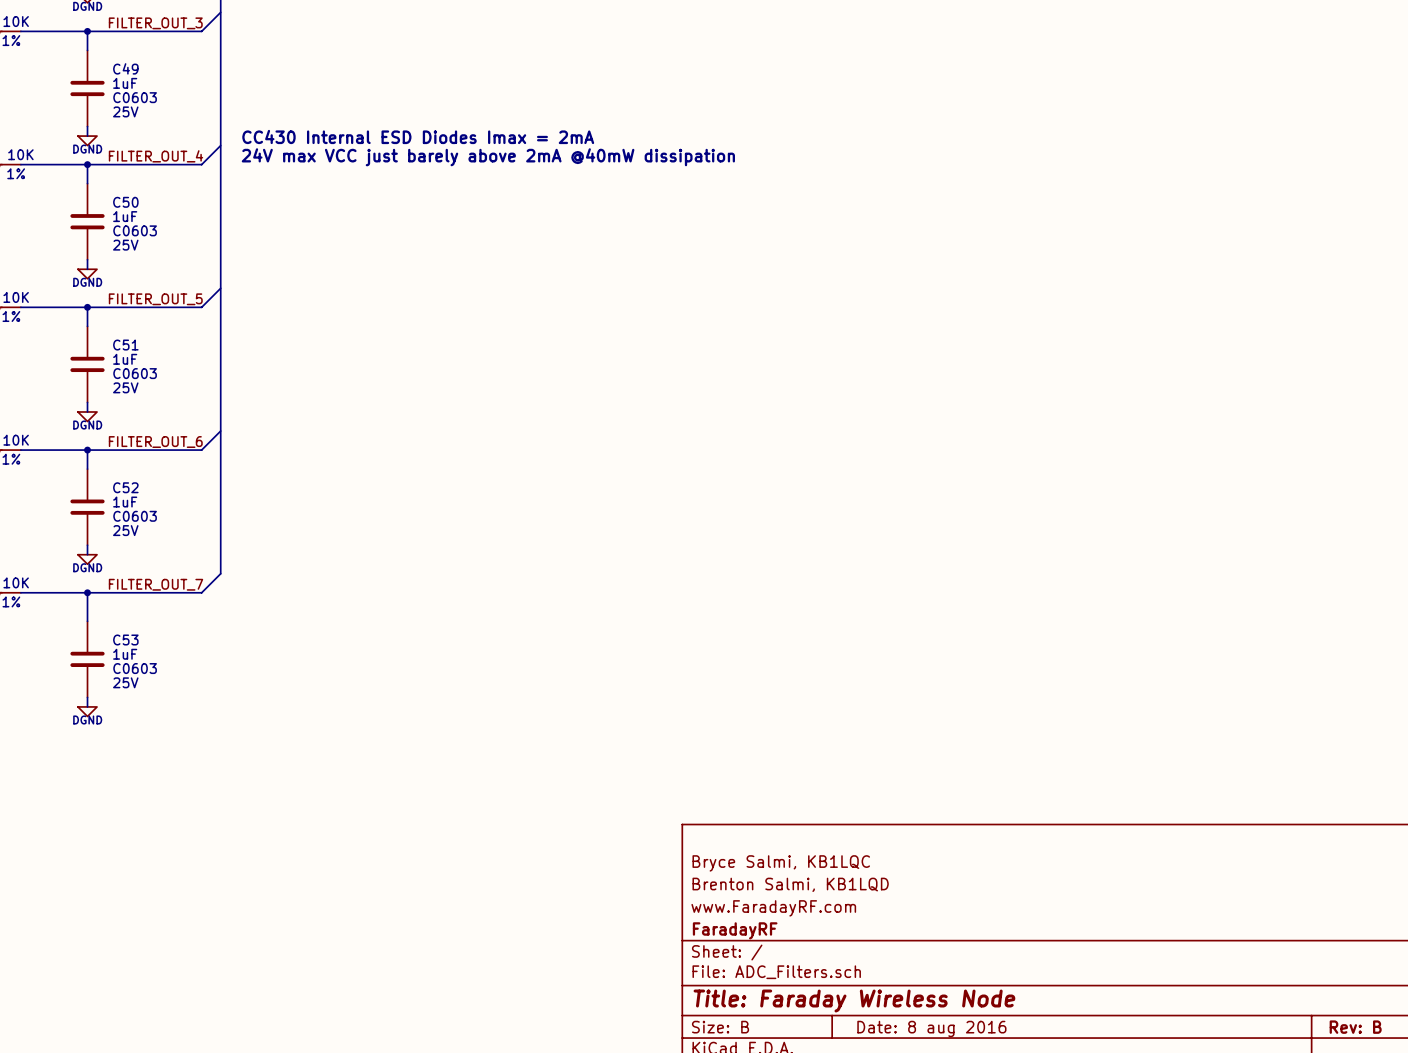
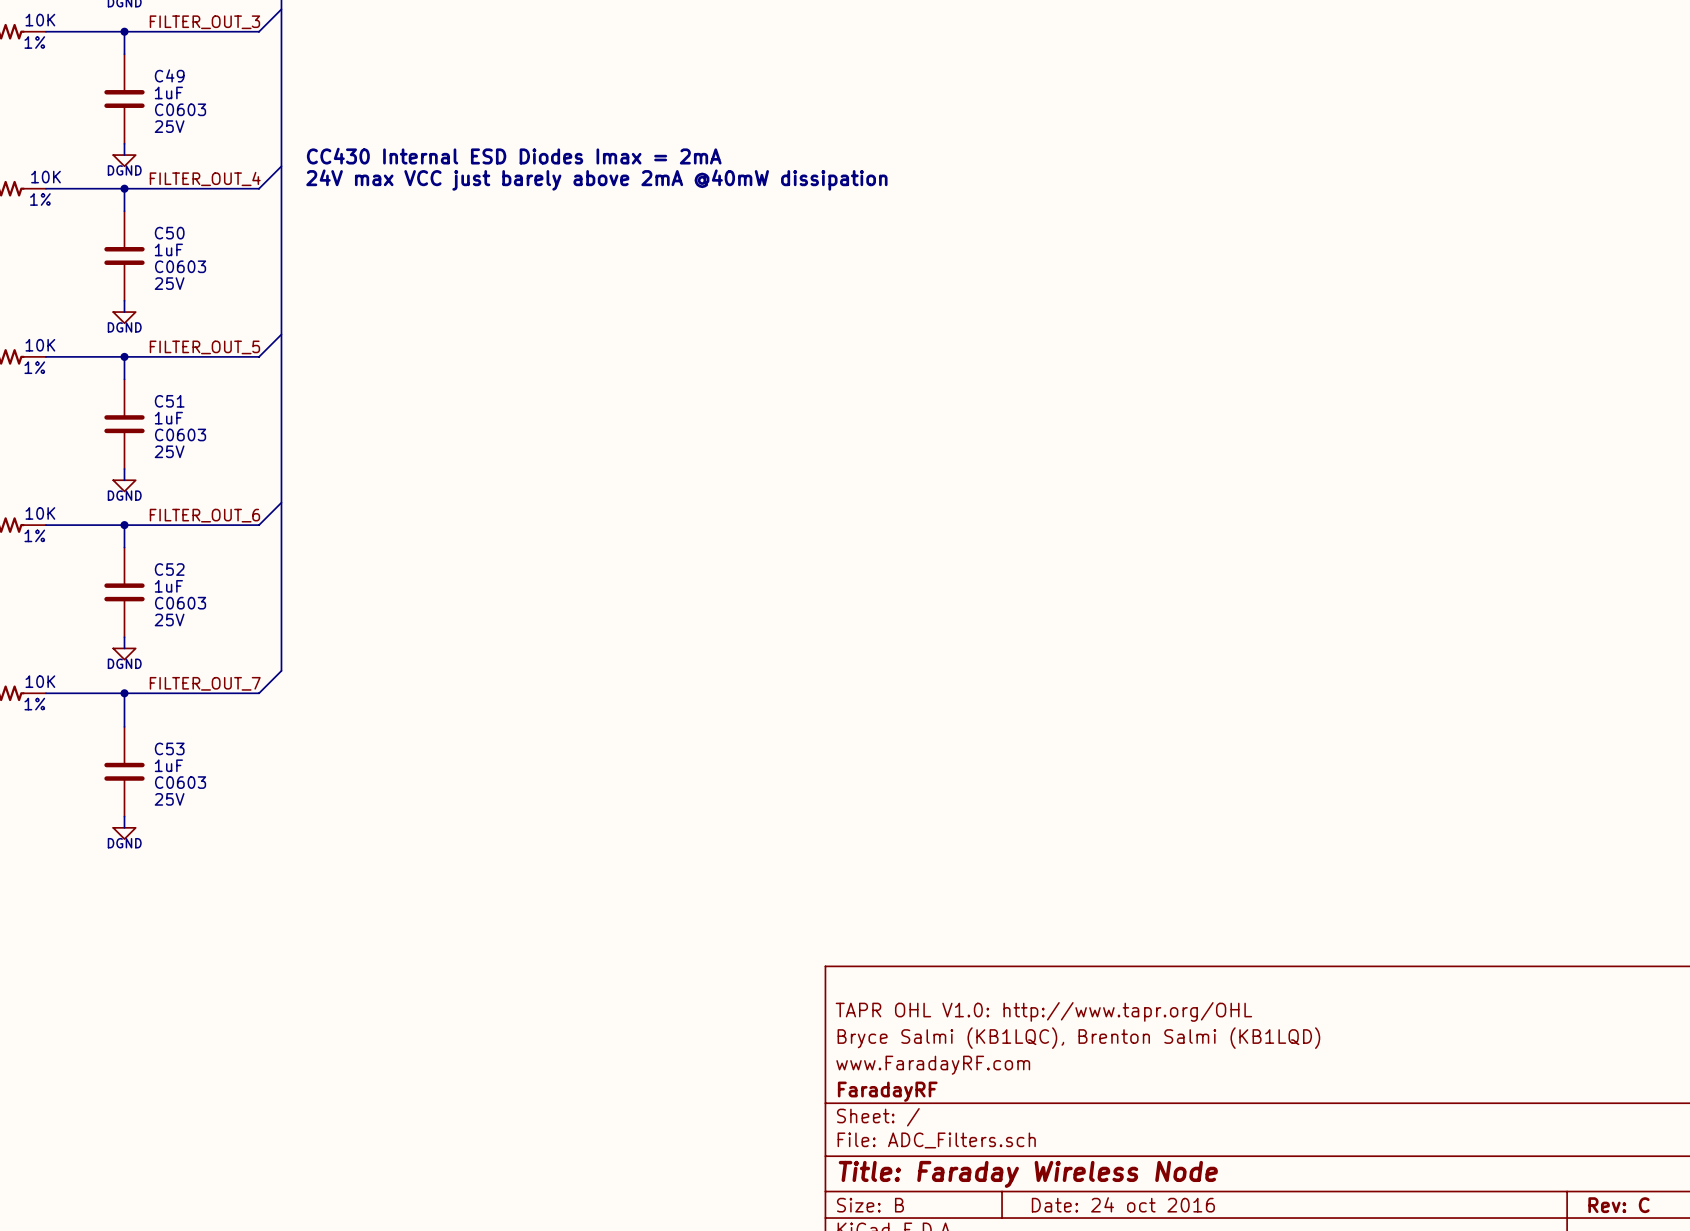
title block: Bryce Salmi, KB1LQC (781, 863) -> TAPR OHL V1.0: http://www.tapr.org/OHL (1043, 1011)
title block: Brenton Salmi, KB1LQD (790, 884) -> Bryce Salmi (KB1LQC), Brenton Salmi (KB1LQD) (1078, 1038)
title block: Rev: B (1355, 1027) -> Rev: C (1618, 1205)
title block: Date: 8 aug 2016 (931, 1028) -> Date: 24 oct 2016 (1123, 1204)

